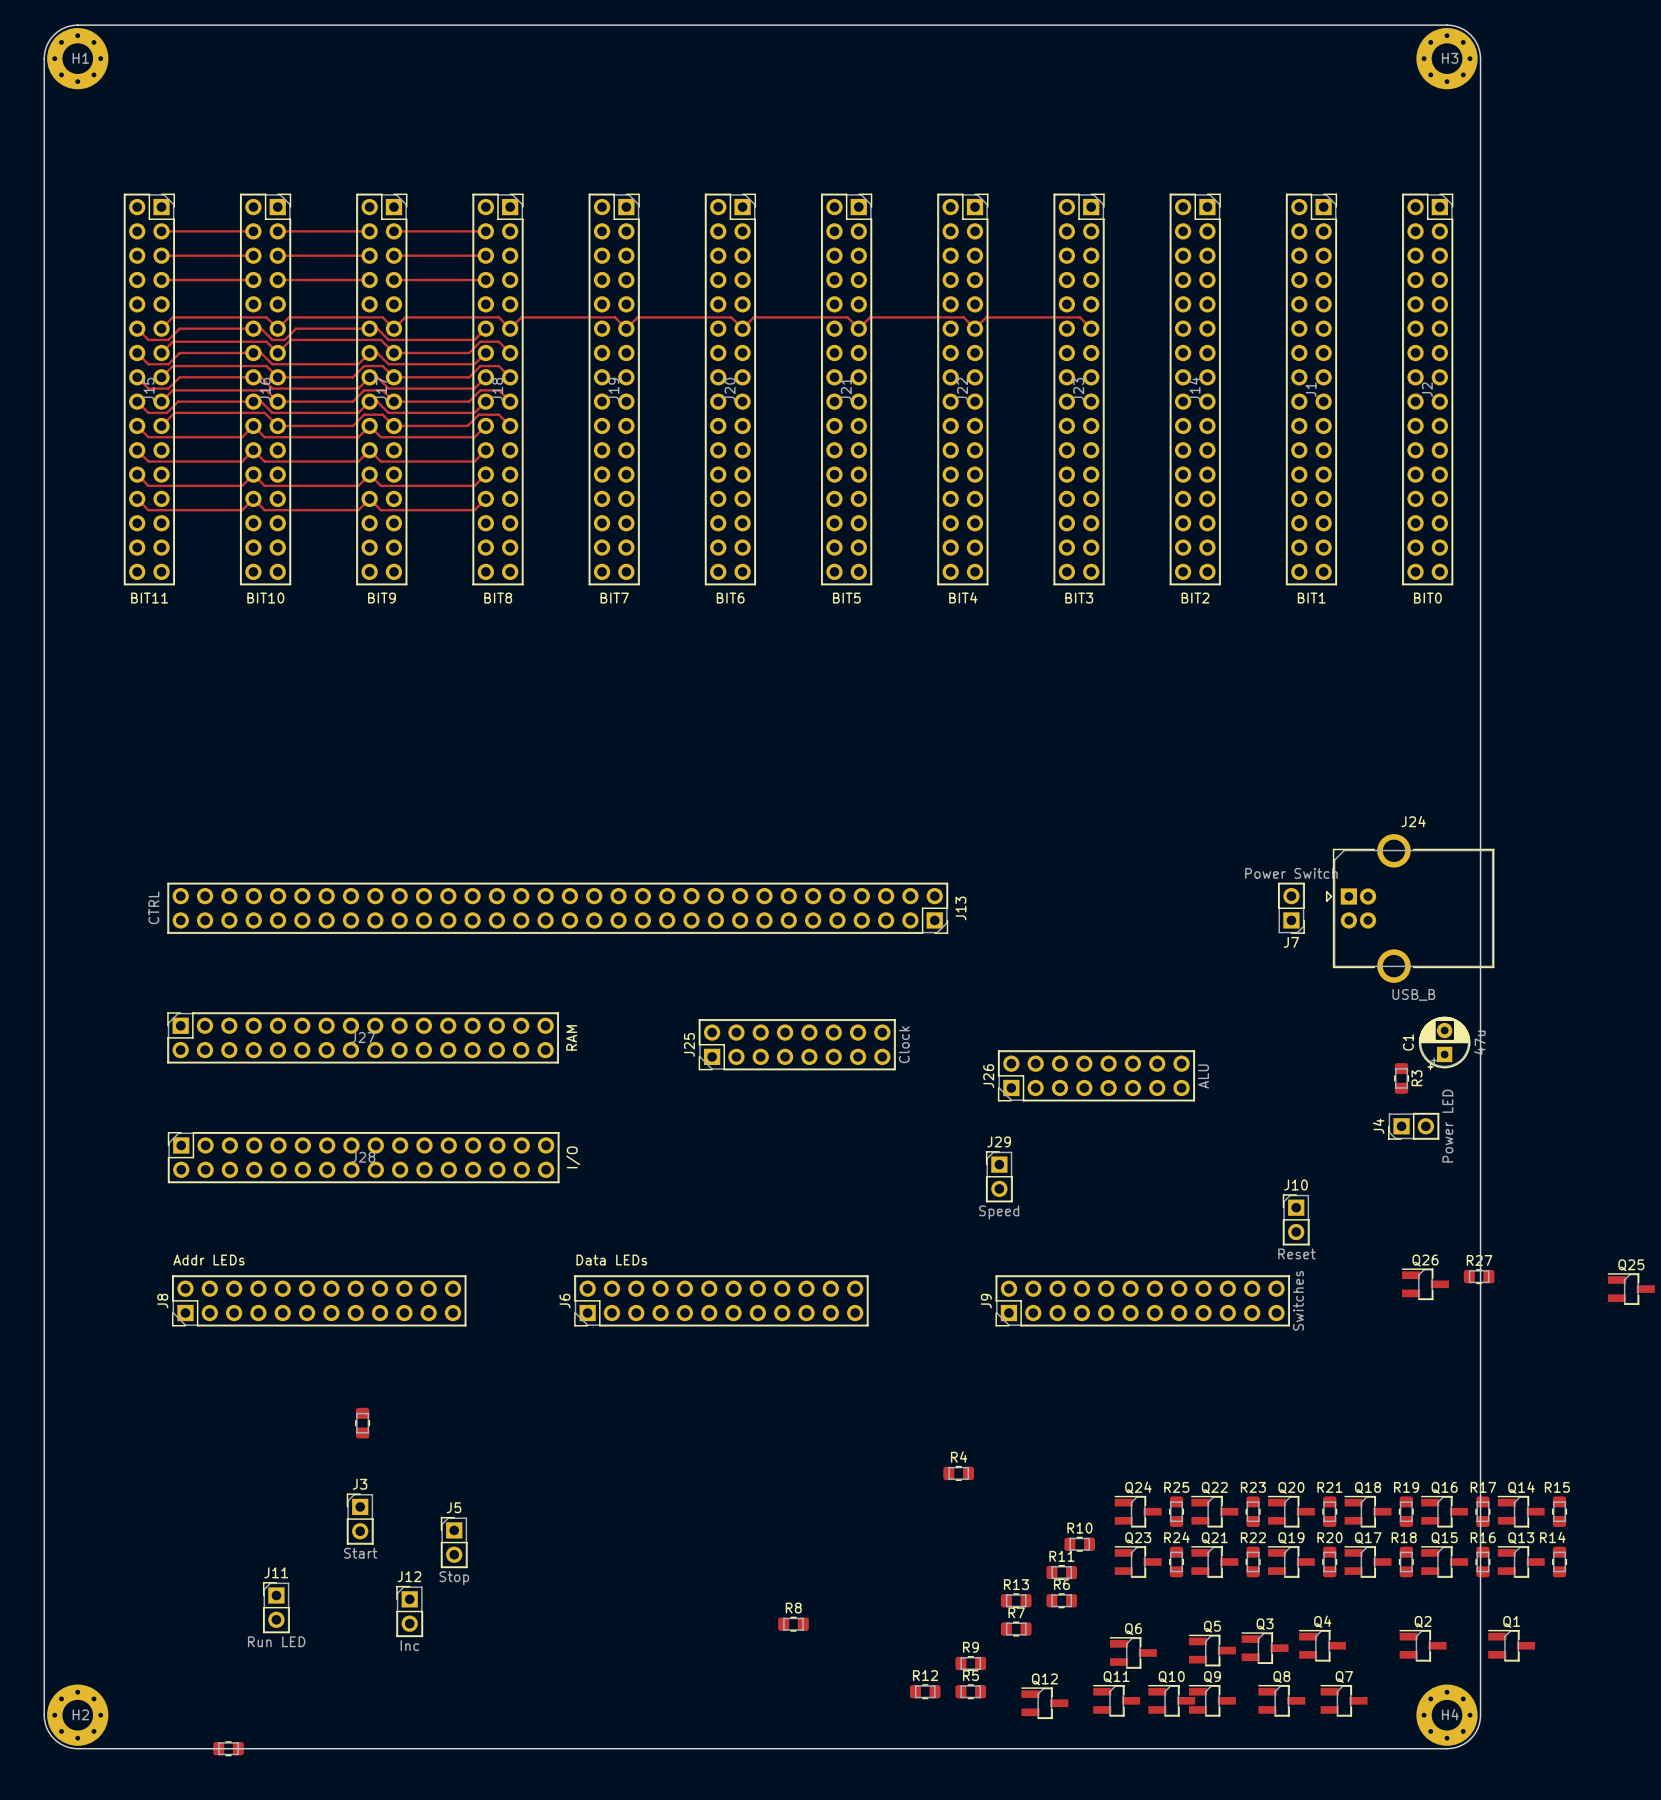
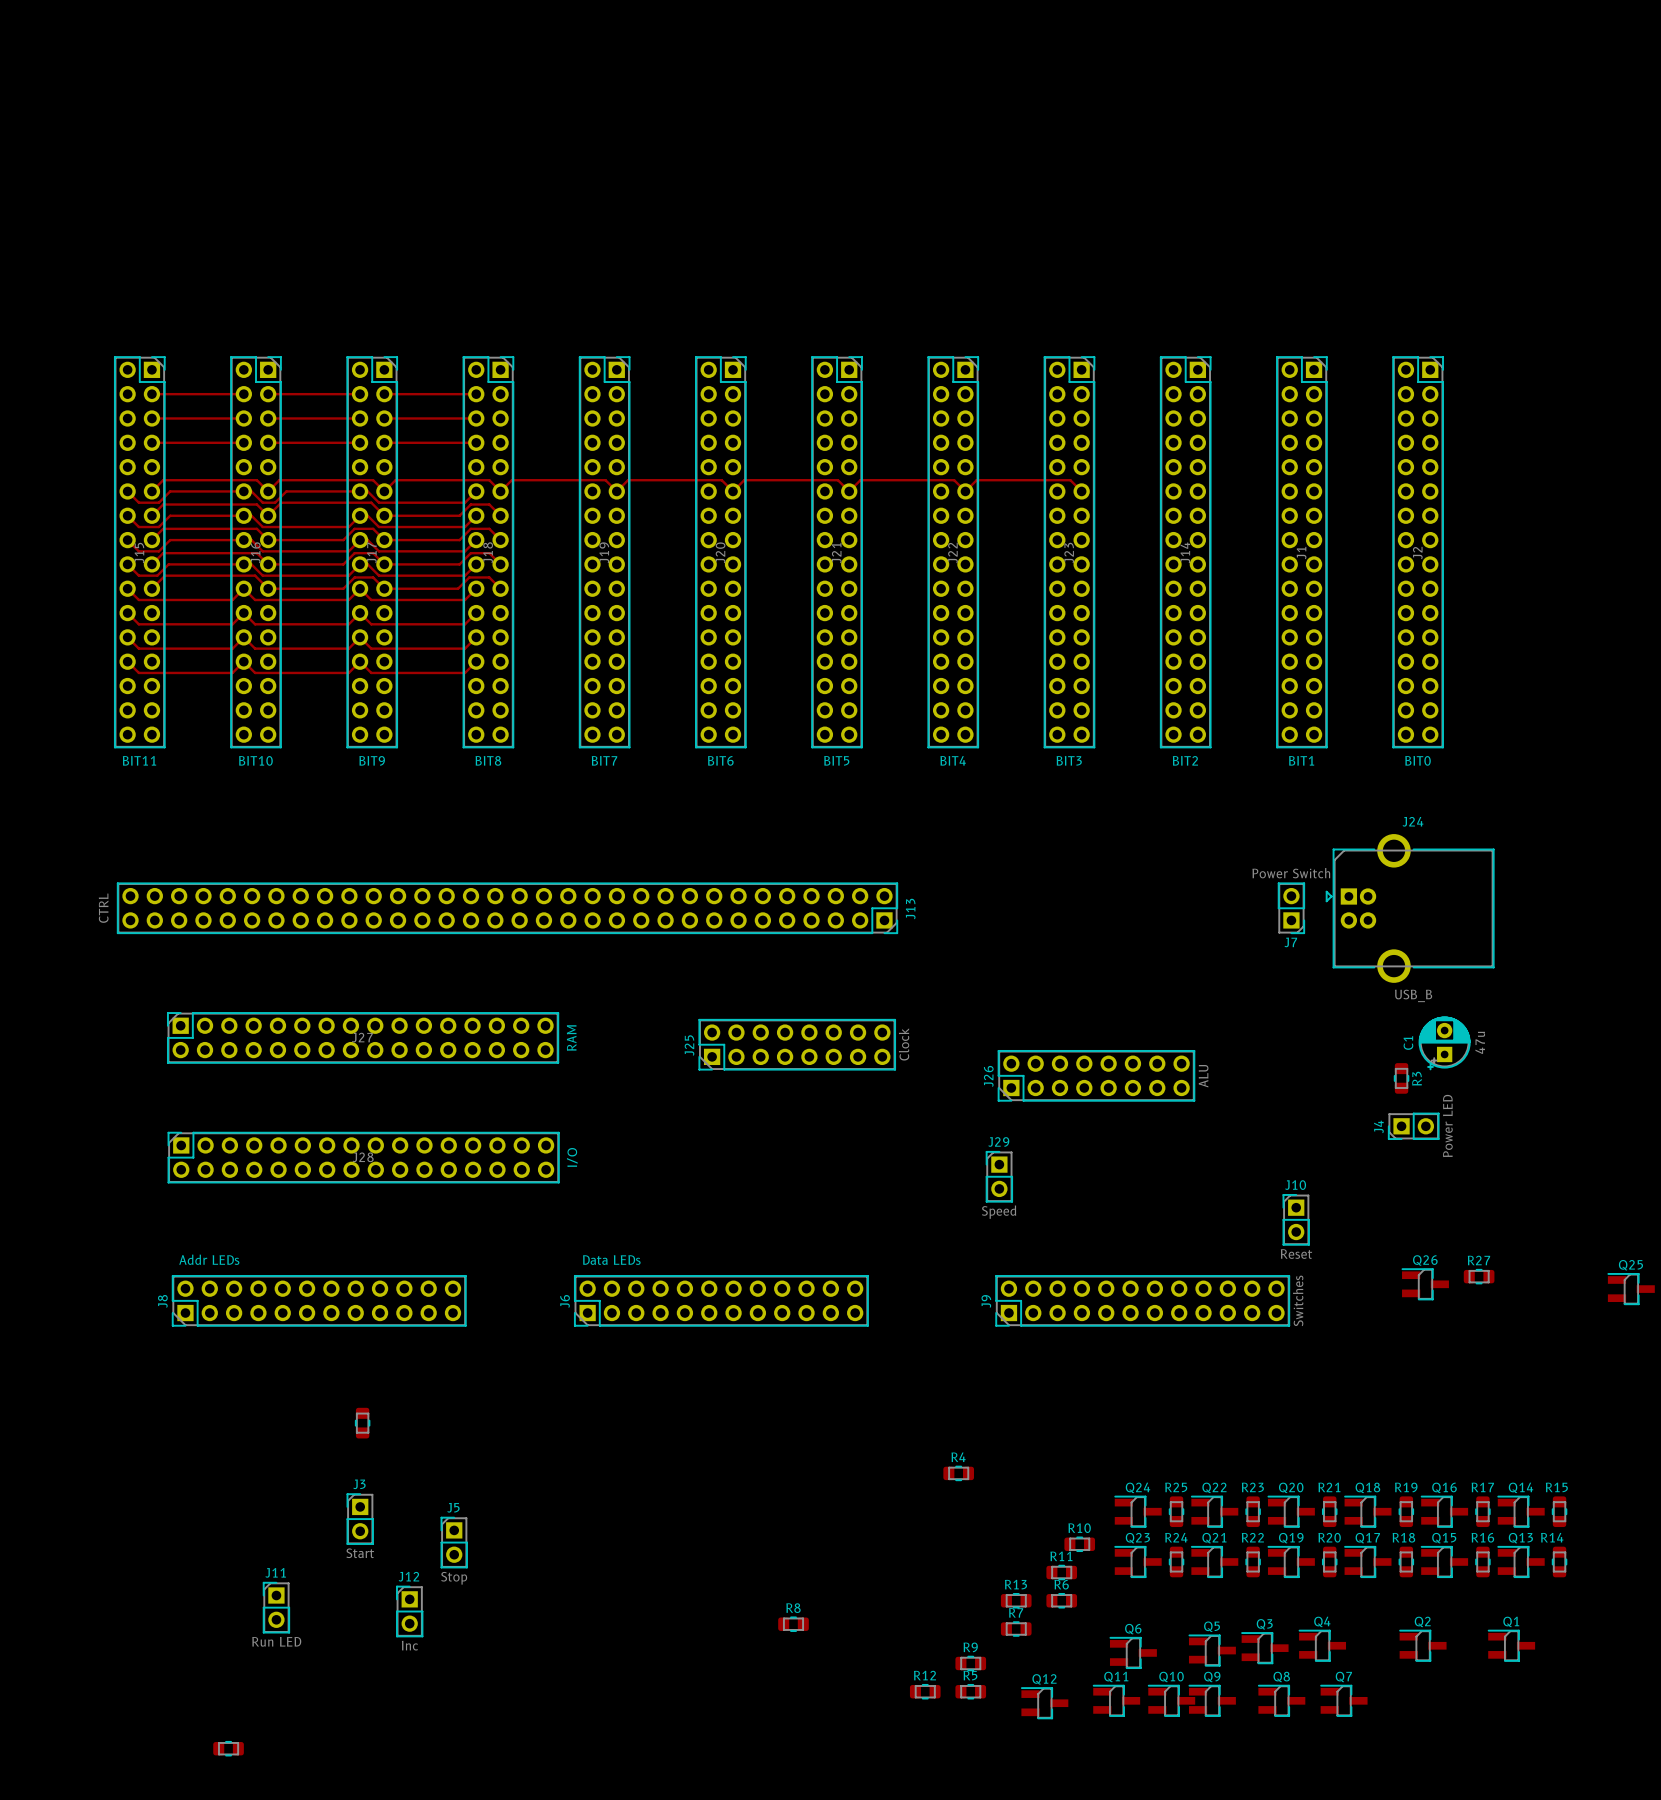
board edge: (77, 25) (1447, 25) (1459, 27) (1473, 38) (1477, 45) (1480, 58) (1480, 1715) (1477, 1728) (1467, 1741) (1459, 1746) (1447, 1748) (77, 1748) (64, 1746) (51, 1735) (46, 1728) (44, 1715) (44, 58) (46, 45) (54, 34) (64, 27) (77, 25) -> none
H1: (77, 58) -> none
H3: (1447, 58) -> none
top track: (161, 231) (253, 231) -> (151, 394) (243, 394)
top track: (277, 231) (369, 231) -> (268, 394) (360, 394)
top track: (393, 231) (485, 231) -> (384, 394) (476, 394)
top track: (161, 255) (253, 255) -> (151, 418) (243, 418)
top track: (277, 255) (369, 255) -> (268, 418) (360, 418)
top track: (393, 255) (485, 255) -> (384, 418) (476, 418)
top track: (161, 280) (253, 280) -> (151, 442) (243, 442)
top track: (277, 280) (369, 280) -> (268, 442) (360, 442)
top track: (393, 280) (485, 280) -> (384, 442) (476, 442)
top track: (137, 328) (148, 339) (168, 339) (179, 328) (261, 328) (272, 339) (284, 339) (295, 328) (377, 328) (388, 339) (474, 339) (485, 328) -> (127, 491) (138, 502) (158, 502) (170, 491) (251, 491) (262, 502) (275, 502) (286, 491) (367, 491) (378, 502) (465, 502) (476, 491)
top track: (161, 328) (172, 317) (266, 317) (277, 328) (288, 317) (382, 317) (393, 328) (405, 317) (498, 317) (510, 328) (521, 317) (615, 317) (626, 328) (637, 317) (731, 317) (742, 328) (753, 317) (847, 317) (858, 328) (870, 317) (963, 317) (975, 328) (986, 317) (1079, 317) (1091, 328) -> (151, 491) (163, 480) (256, 480) (268, 491) (279, 480) (373, 480) (384, 491) (395, 480) (489, 480) (500, 491) (511, 480) (605, 480) (616, 491) (628, 480) (721, 480) (733, 491) (744, 480) (837, 480) (849, 491) (860, 480) (954, 480) (965, 491) (976, 480) (1070, 480) (1081, 491)
top track: (137, 352) (148, 364) (168, 364) (179, 352) (261, 352) (272, 364) (358, 364) (369, 352) (377, 352) (388, 364) (474, 364) (485, 352) -> (127, 515) (138, 527) (158, 527) (170, 515) (251, 515) (262, 527) (348, 527) (360, 515) (367, 515) (378, 527) (465, 527) (476, 515)
top track: (161, 352) (172, 341) (266, 341) (277, 352) (290, 339) (380, 339) (393, 352) (469, 352) (480, 341) (498, 341) (510, 352) -> (151, 515) (163, 504) (256, 504) (268, 515) (281, 502) (371, 502) (384, 515) (459, 515) (470, 504) (489, 504) (500, 515)
top track: (137, 377) (148, 388) (168, 388) (179, 377) (261, 377) (272, 388) (358, 388) (369, 377) (377, 377) (388, 388) (474, 388) (485, 377) -> (127, 540) (138, 551) (158, 551) (170, 540) (251, 540) (262, 551) (348, 551) (360, 540) (367, 540) (378, 551) (465, 551) (476, 540)
top track: (161, 377) (172, 366) (266, 366) (277, 377) (352, 377) (364, 366) (382, 366) (393, 377) (469, 377) (480, 366) (498, 366) (510, 377) -> (151, 540) (163, 528) (256, 528) (268, 540) (343, 540) (354, 528) (373, 528) (384, 540) (459, 540) (470, 528) (489, 528) (500, 540)
J15 position: (149, 389) -> (139, 552)
J16 position: (265, 389) -> (256, 552)
J17 position: (381, 389) -> (372, 552)
J18 position: (498, 389) -> (488, 552)
J19 position: (614, 389) -> (604, 552)
J20 position: (730, 389) -> (720, 552)
J21 position: (846, 389) -> (837, 552)
J22 position: (962, 389) -> (953, 552)
J23 position: (1079, 389) -> (1069, 552)
J14 position: (1195, 389) -> (1185, 552)
J1 position: (1311, 389) -> (1301, 552)
J2 position: (1427, 389) -> (1418, 552)
top track: (137, 401) (148, 412) (166, 412) (178, 401) (261, 401) (272, 412) (358, 412) (369, 401) (377, 401) (388, 412) (474, 412) (485, 401) -> (127, 564) (138, 575) (157, 575) (168, 564) (251, 564) (262, 575) (348, 575) (360, 564) (367, 564) (378, 575) (465, 575) (476, 564)
top track: (161, 401) (172, 390) (266, 390) (277, 401) (352, 401) (364, 390) (382, 390) (393, 401) (469, 401) (480, 390) (498, 390) (510, 401) -> (151, 564) (163, 553) (256, 553) (268, 564) (343, 564) (354, 553) (373, 553) (384, 564) (459, 564) (470, 553) (489, 553) (500, 564)
top track: (137, 425) (148, 437) (242, 437) (253, 425) (264, 437) (358, 437) (369, 425) (380, 437) (474, 437) (485, 425) -> (127, 588) (138, 599) (232, 599) (243, 588) (255, 599) (348, 599) (360, 588) (371, 599) (465, 599) (476, 588)
top track: (161, 425) (174, 412) (264, 412) (277, 425) (352, 425) (364, 414) (382, 414) (393, 425) (467, 425) (478, 414) (498, 414) (510, 425) -> (151, 588) (165, 575) (255, 575) (268, 588) (343, 588) (354, 577) (373, 577) (384, 588) (458, 588) (469, 577) (489, 577) (500, 588)
top track: (137, 450) (148, 461) (242, 461) (253, 450) (264, 461) (358, 461) (369, 450) (380, 461) (474, 461) (485, 450) -> (127, 613) (138, 624) (232, 624) (243, 613) (255, 624) (348, 624) (360, 613) (371, 624) (465, 624) (476, 613)
top track: (137, 474) (148, 485) (242, 485) (253, 474) (264, 485) (358, 485) (369, 474) (380, 485) (474, 485) (485, 474) -> (127, 637) (138, 648) (232, 648) (243, 637) (255, 648) (348, 648) (360, 637) (371, 648) (465, 648) (476, 637)
top track: (137, 498) (148, 510) (242, 510) (253, 498) (264, 510) (358, 510) (369, 498) (380, 510) (474, 510) (485, 498) -> (127, 661) (138, 672) (232, 672) (243, 661) (255, 672) (348, 672) (360, 661) (371, 672) (465, 672) (476, 661)
J13 position: (557, 908) -> (507, 908)
H2: (77, 1715) -> none
H4: (1447, 1715) -> none

